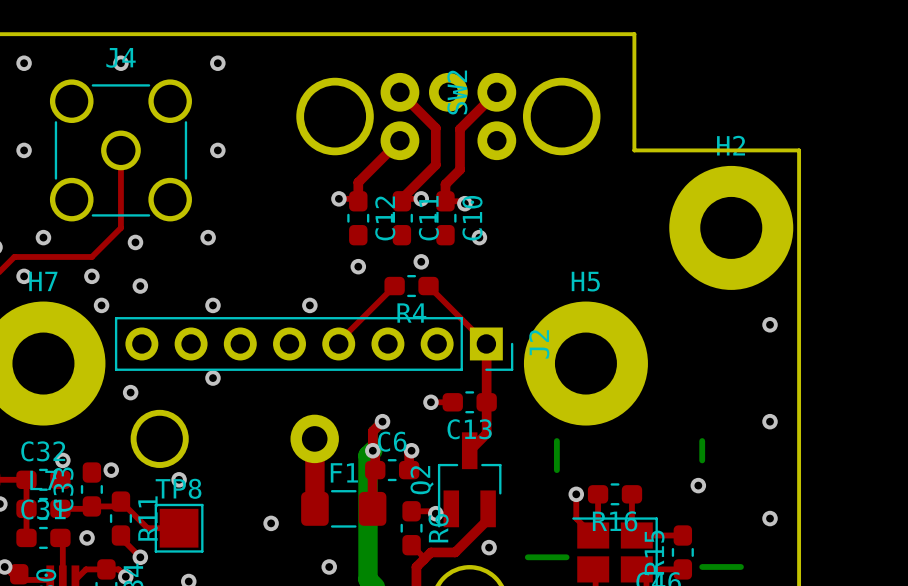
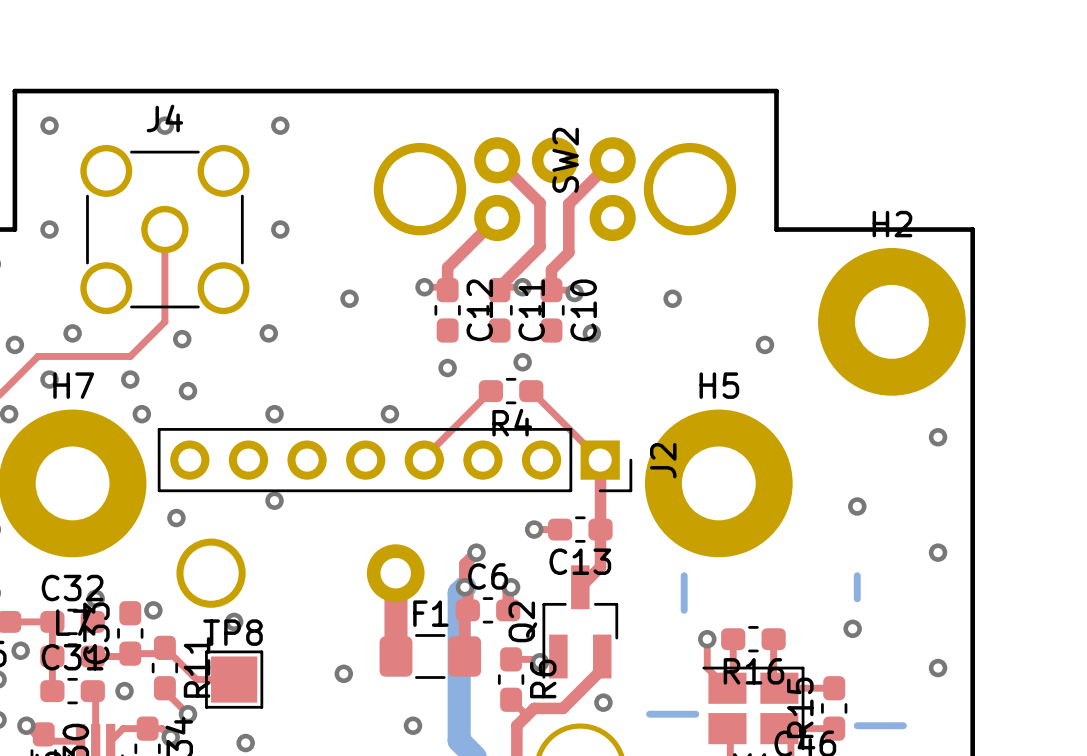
via: none -> (349, 298)
via: none -> (672, 298)
via: none -> (764, 344)
via: none -> (857, 506)

